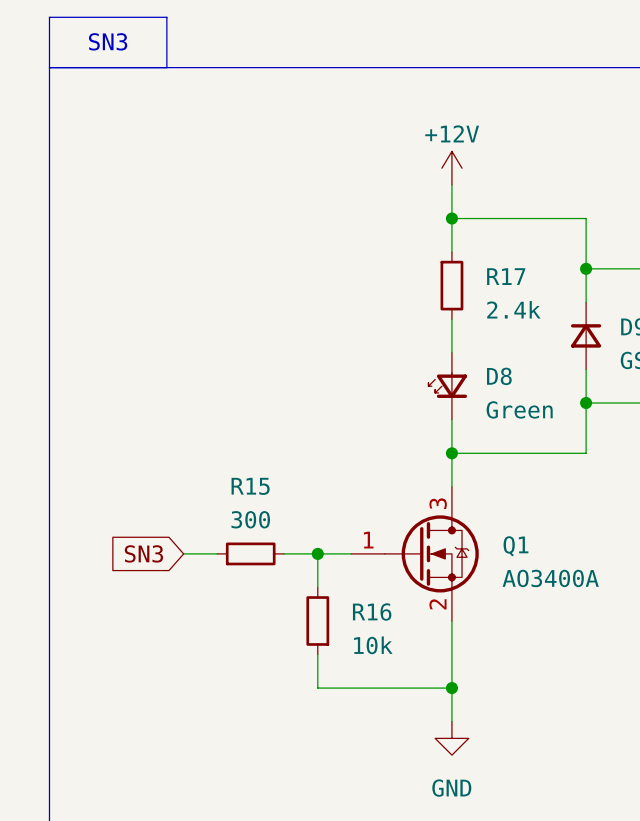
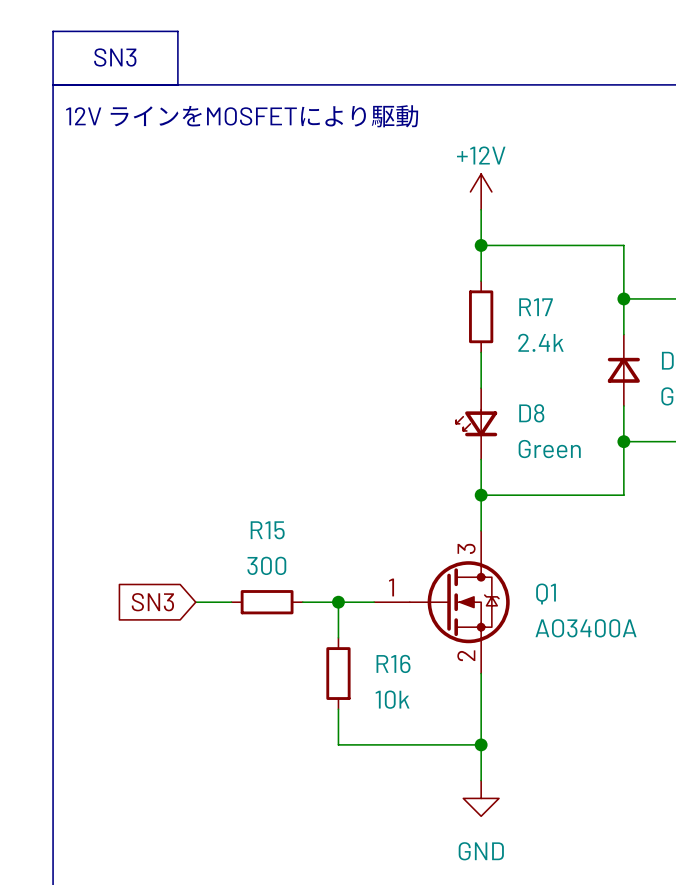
text: none -> 12V ラインをMOSFETにより駆動 (242, 116)

